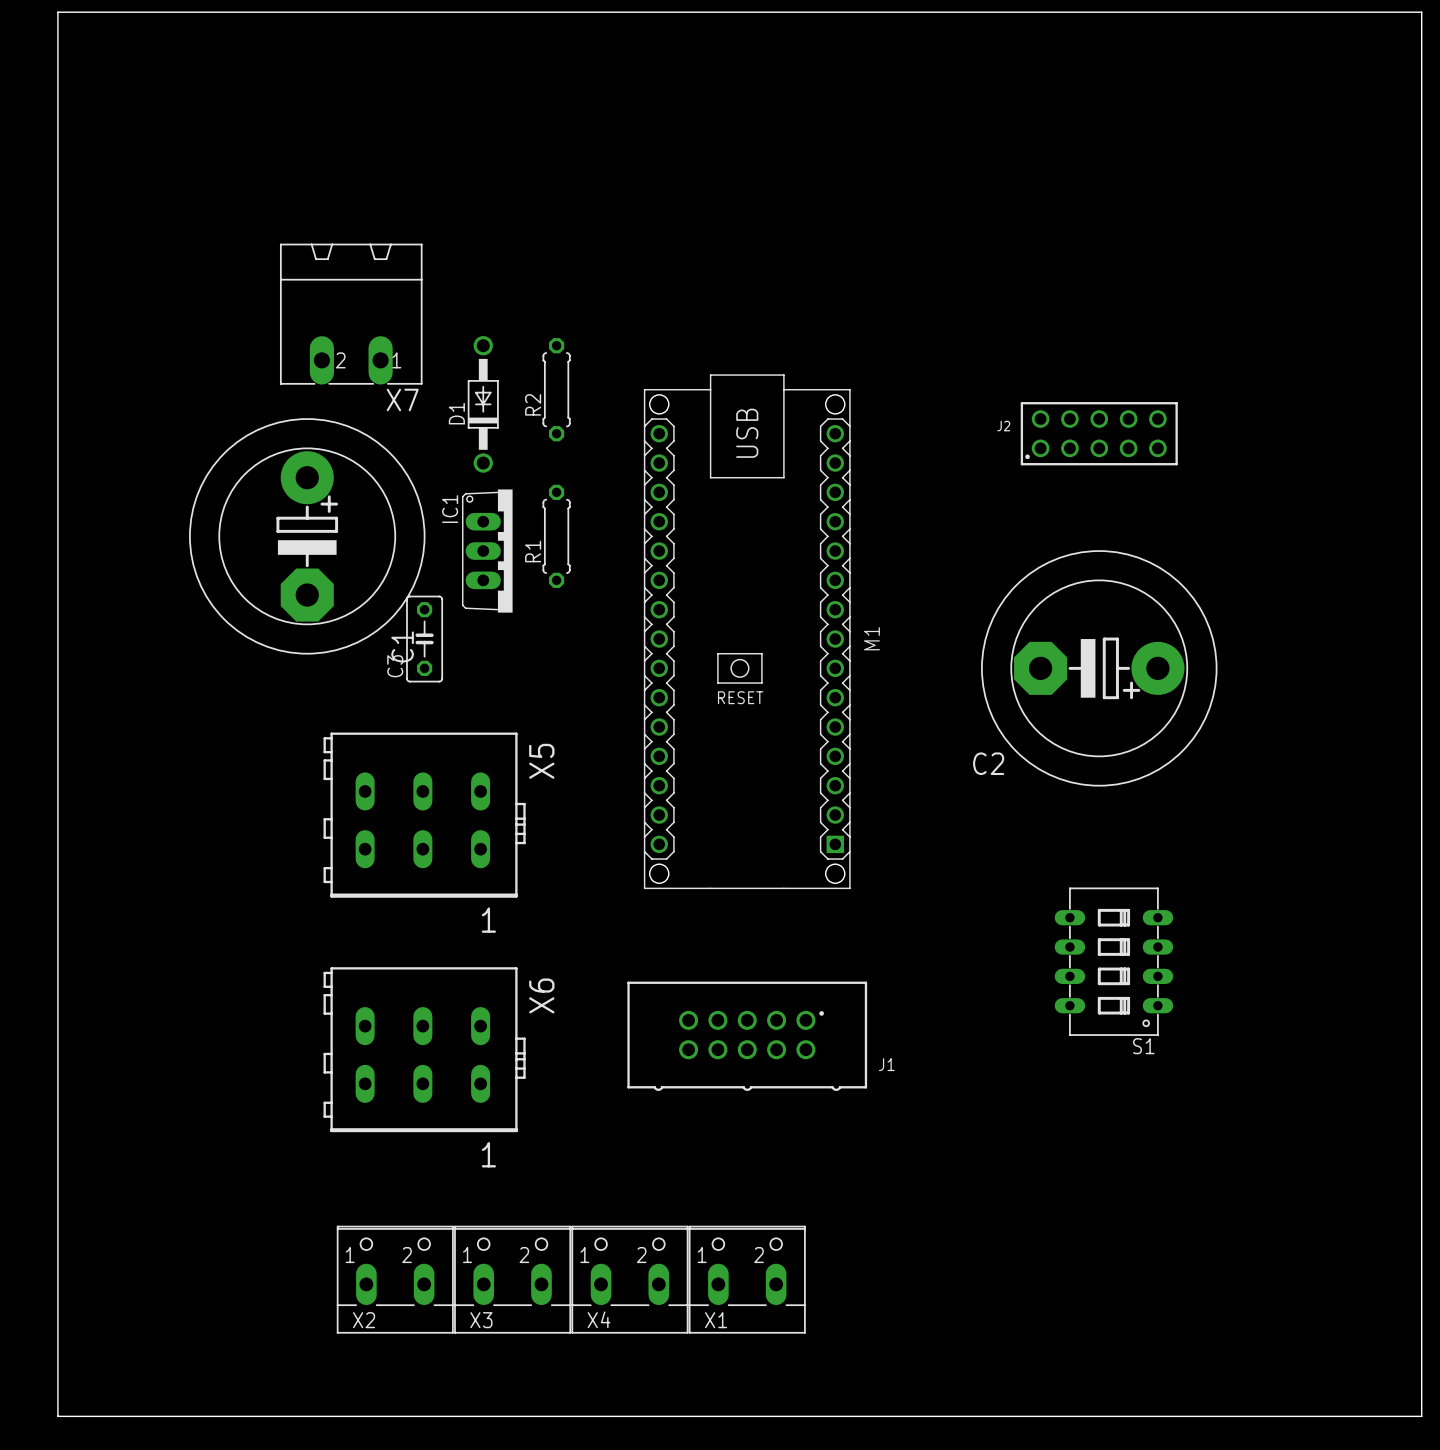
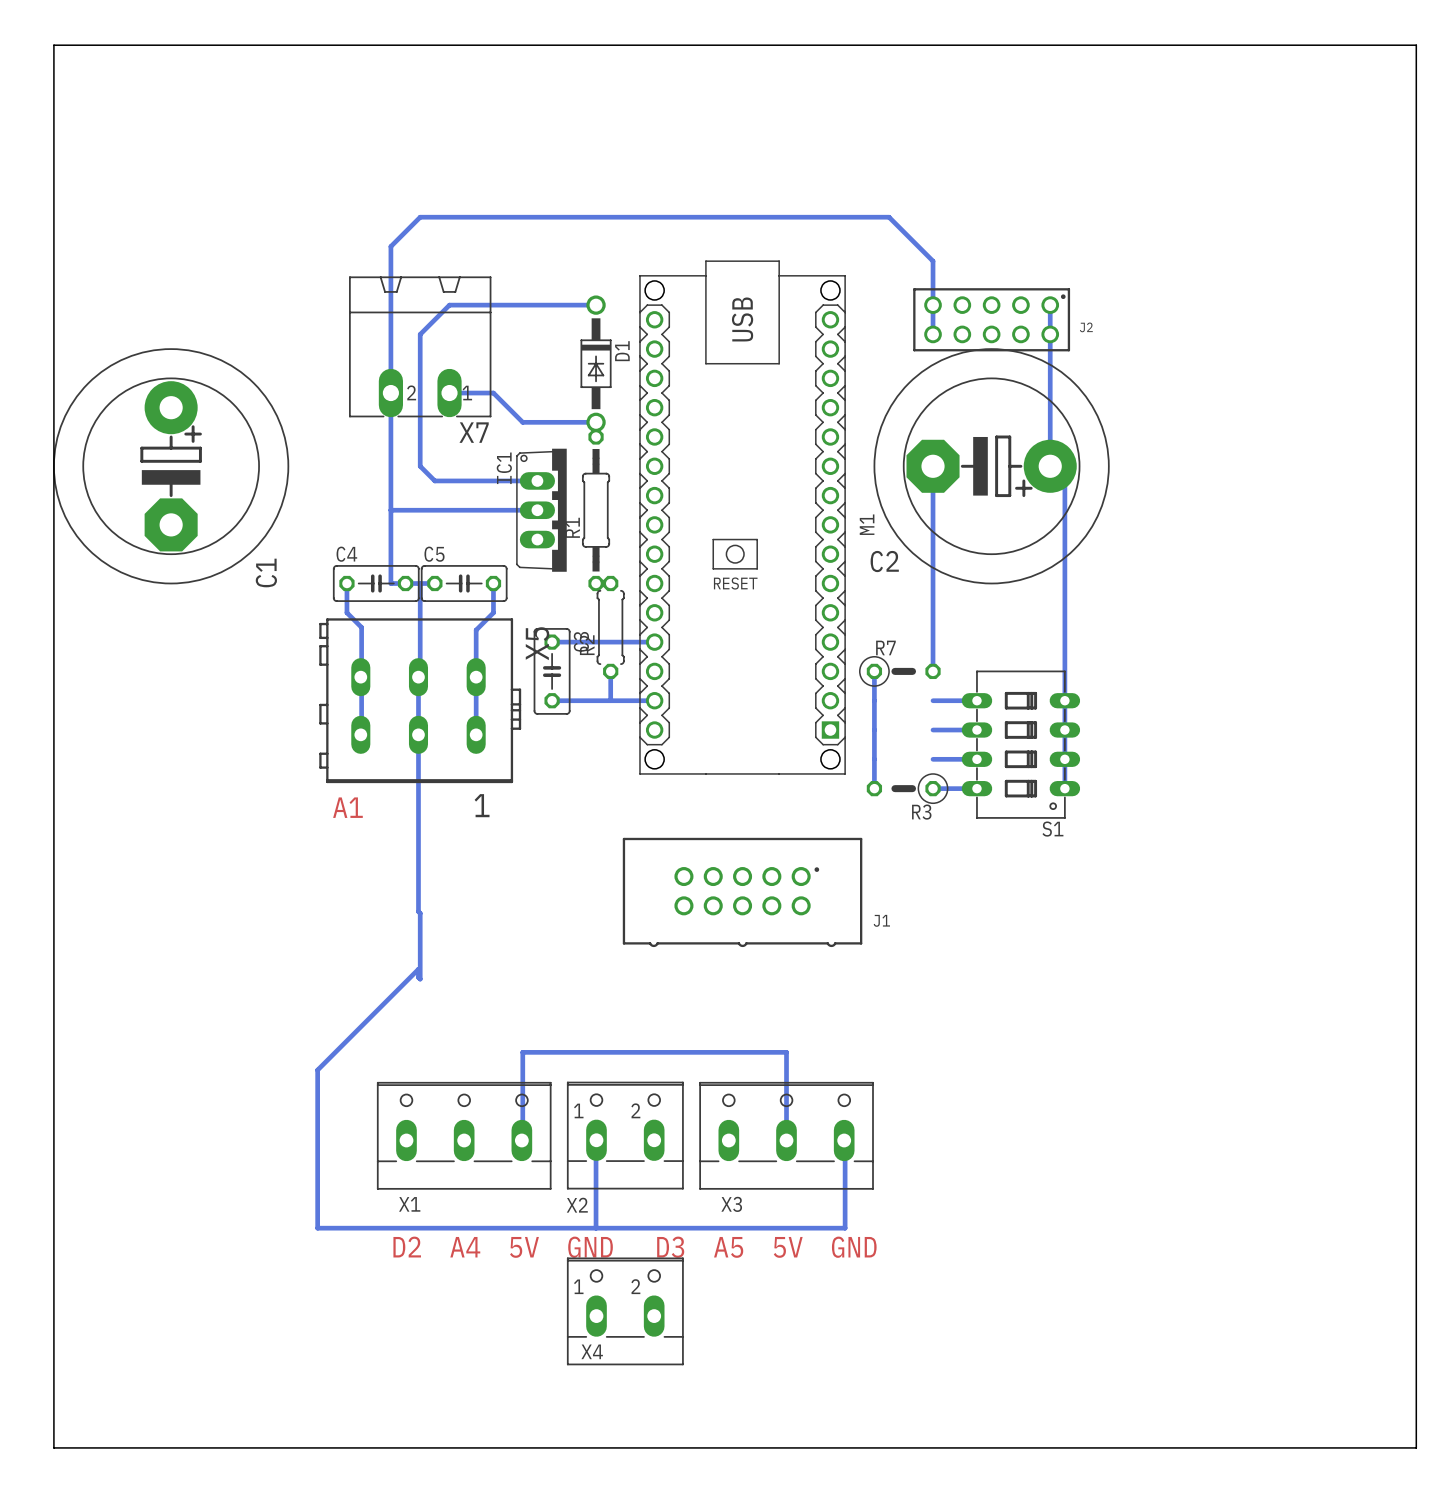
bottom track: none -> (596, 305) (449, 305) (420, 334) (420, 466) (434, 480) (537, 480)
bottom track: none -> (1050, 305) (1050, 466) (1064, 480) (1064, 788)
bottom track: none -> (933, 334) (933, 261) (889, 217) (420, 217) (390, 246) (390, 583) (434, 583)
X7 position: (351, 314) -> (420, 346)
bottom track: none -> (449, 393) (493, 393) (522, 422) (596, 422) (596, 436)
R2 position: (556, 389) -> (610, 627)
D1 rotation: 0° (483, 404) -> 180° (596, 363)
D1 position: (483, 404) -> (596, 363)
bottom track: none -> (933, 466) (933, 671)
J2 rotation: 0° (1099, 433) -> 180° (991, 319)
J2 position: (1099, 433) -> (991, 319)
bottom track: none -> (390, 510) (537, 510)
R1 footprint: [542, 484, 571, 588] -> [581, 429, 611, 592]
C1 position: (307, 536) -> (171, 466)
bottom track: none -> (346, 583) (346, 612) (361, 627) (360, 734)
C4: none -> (376, 583)
bottom track: none -> (420, 583) (420, 675) (418, 677) (420, 979) (418, 969) (317, 1070) (317, 1228) (845, 1228) (844, 1140)
C5: none -> (464, 583)
IC1 position: (487, 551) -> (541, 510)
bottom track: none -> (493, 583) (493, 612) (476, 630) (476, 734)
bottom track: none -> (552, 642) (654, 642)
M1 position: (747, 631) -> (742, 517)
C3 rotation: 0° (424, 639) -> 180° (552, 671)
C3 position: (424, 639) -> (552, 671)
bottom track: none -> (610, 671) (610, 700)
bottom track: none -> (874, 671) (874, 788)
R7: none -> (899, 671)
bottom track: none -> (552, 700) (654, 700)
bottom track: none -> (933, 700) (976, 700)
C2 position: (1099, 668) -> (991, 466)
bottom track: none -> (933, 730) (976, 730)
bottom track: none -> (933, 759) (976, 759)
R3: none -> (907, 788)
bottom track: none -> (933, 788) (976, 788)
text: none -> A1 (347, 807)
X5 position: (424, 815) -> (420, 700)
S1 position: (1113, 961) -> (1020, 744)
J1 position: (747, 1036) -> (742, 892)
X6: (424, 1049) -> none
bottom track: none -> (521, 1140) (522, 1052) (786, 1052) (786, 1140)
bottom track: none -> (596, 1140) (596, 1228)
text: none -> A4 (465, 1247)
text: none -> D2 (407, 1247)
text: none -> 5V (524, 1247)
text: none -> GND (590, 1247)
text: none -> D3 (670, 1247)
text: none -> A5 (728, 1247)
text: none -> 5V (788, 1247)
text: none -> GND (854, 1247)
X3 footprint: [454, 1225, 572, 1334] -> [699, 1081, 874, 1190]
X1 footprint: [688, 1225, 806, 1334] -> [376, 1081, 552, 1190]
X2 position: (395, 1279) -> (625, 1135)
X2 name position: X2 (364, 1320) -> X2 (577, 1205)
X3 name position: X3 (481, 1320) -> X3 (731, 1204)
X1 name position: X1 (716, 1320) -> X1 (409, 1204)

